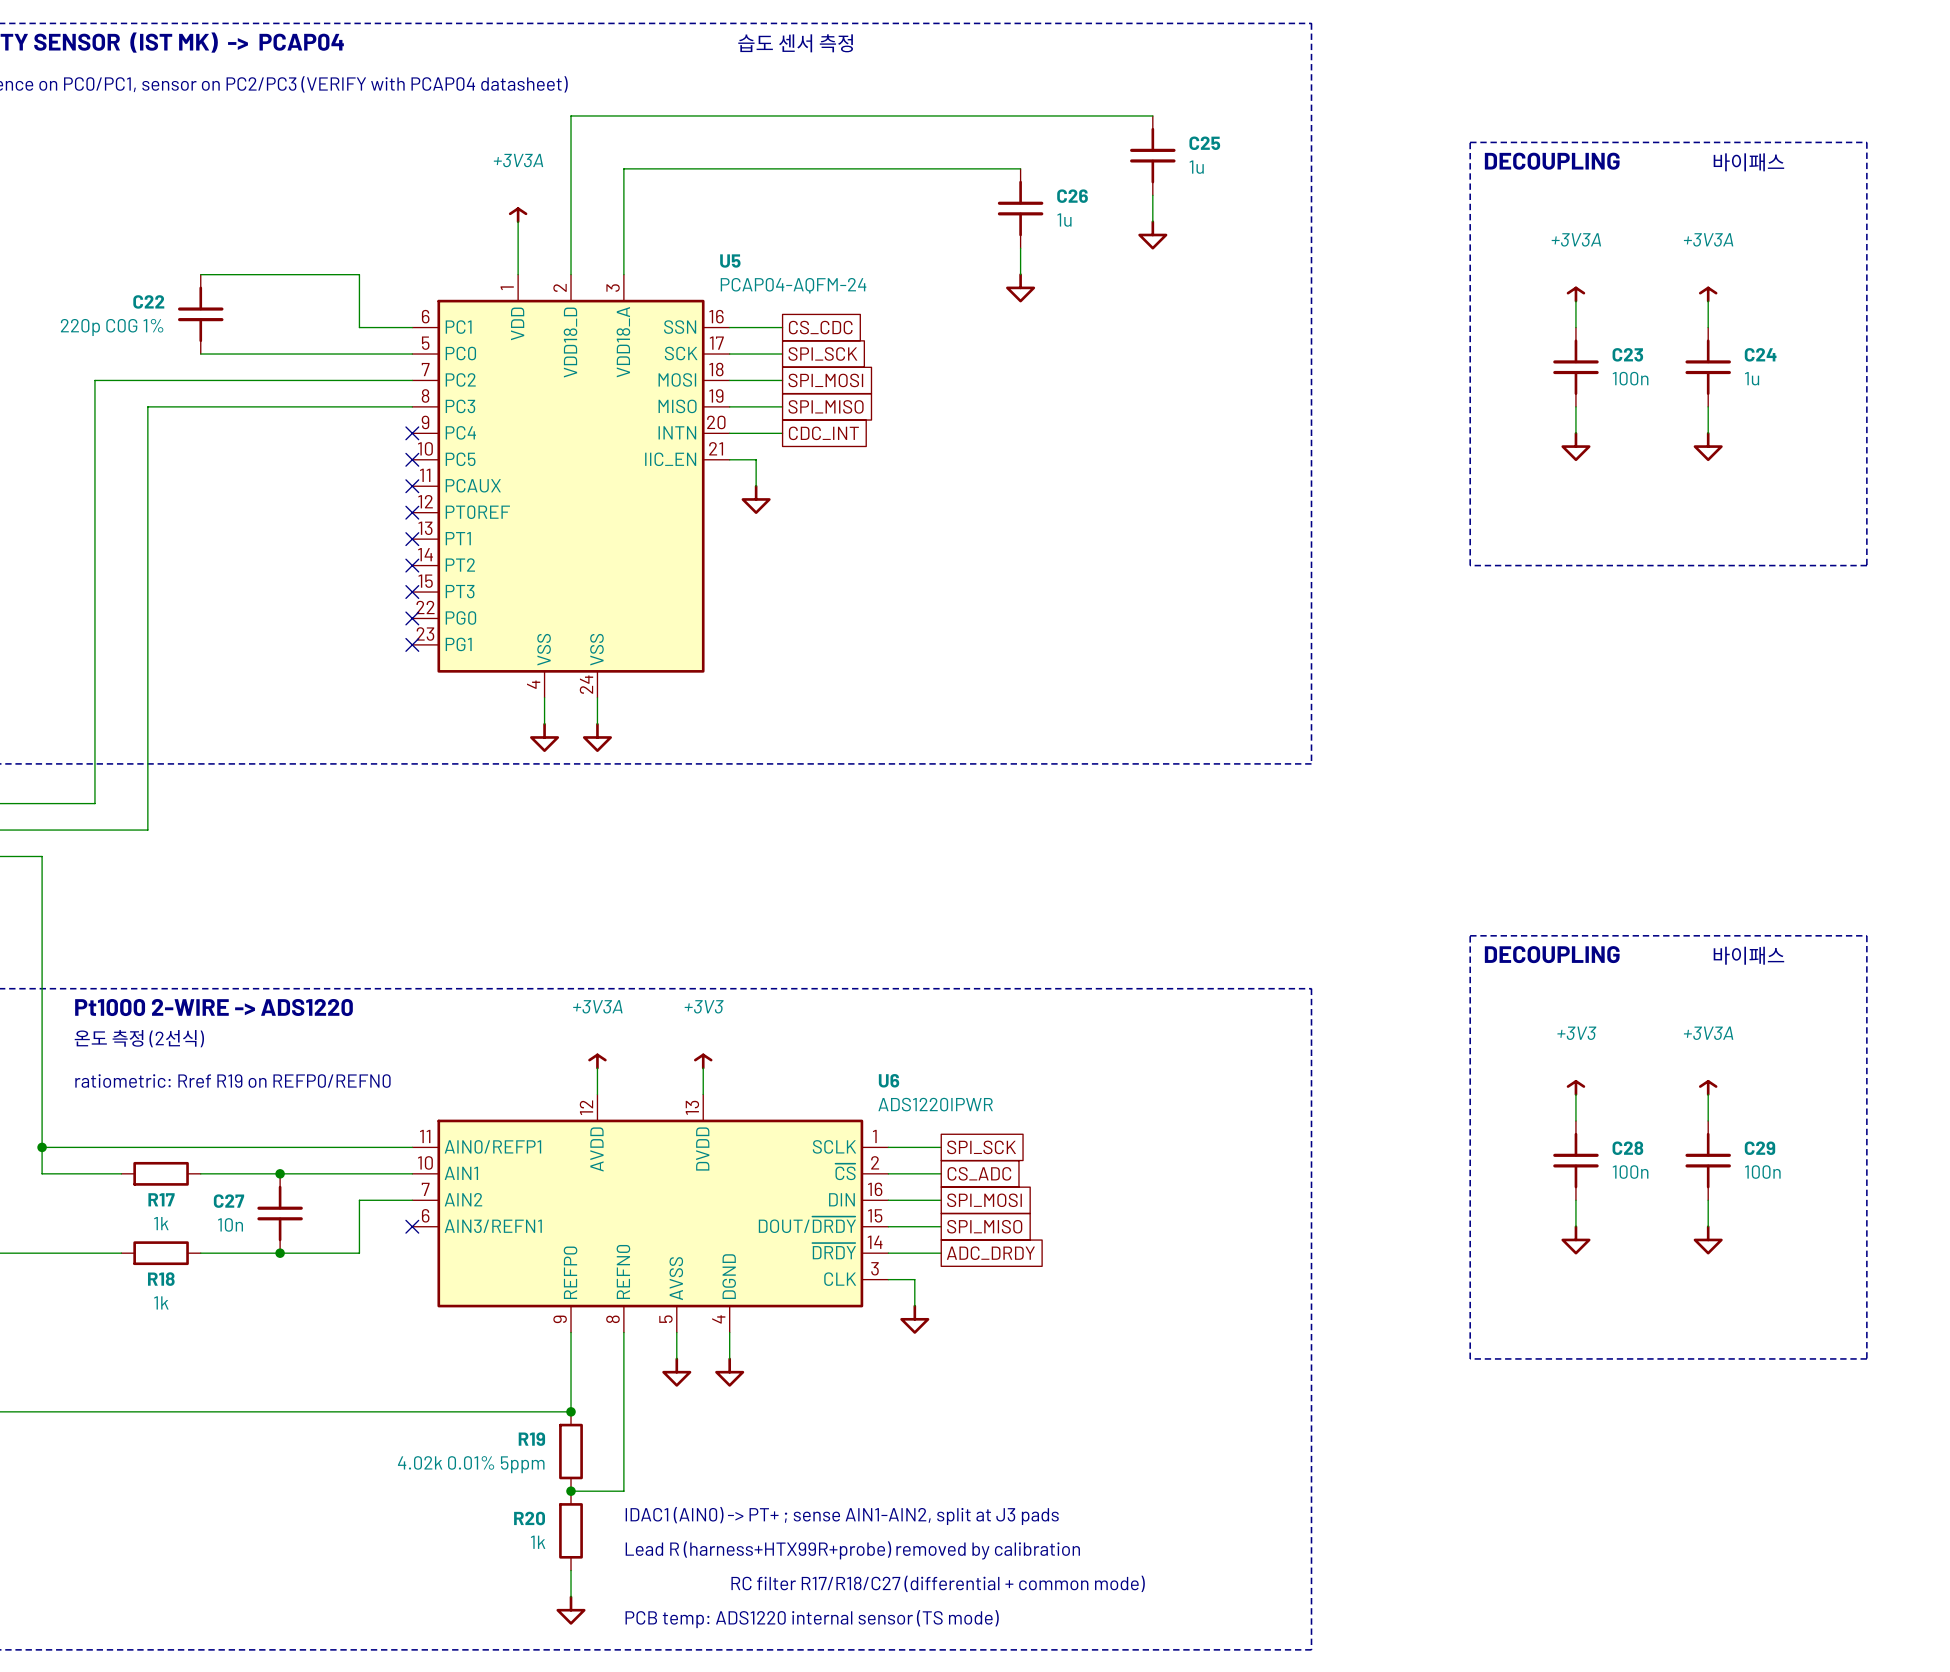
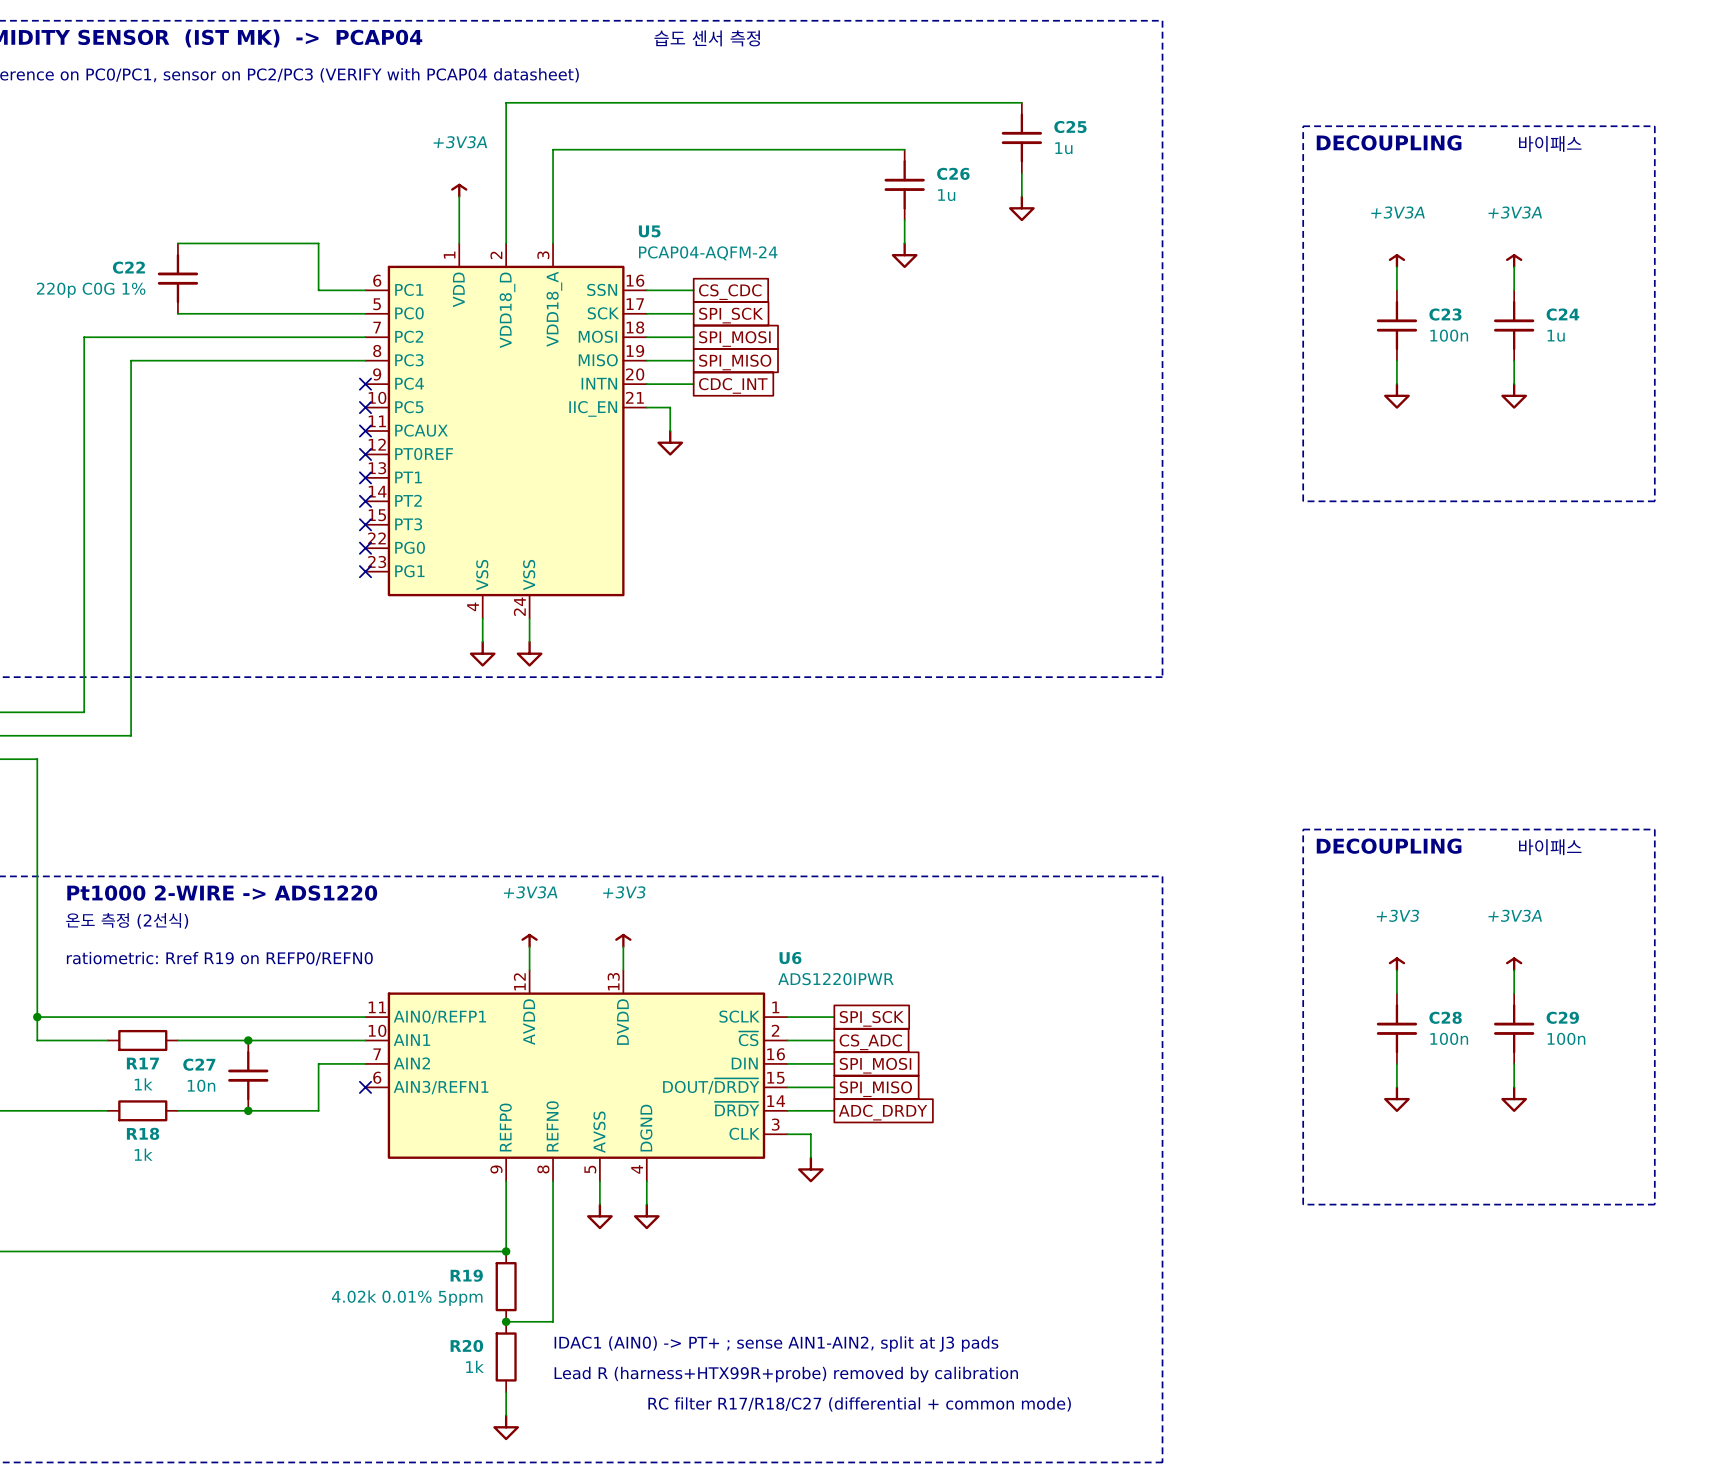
text: PCB temp: ADS1220 internal sensor (TS mode) (812, 1619) -> none

